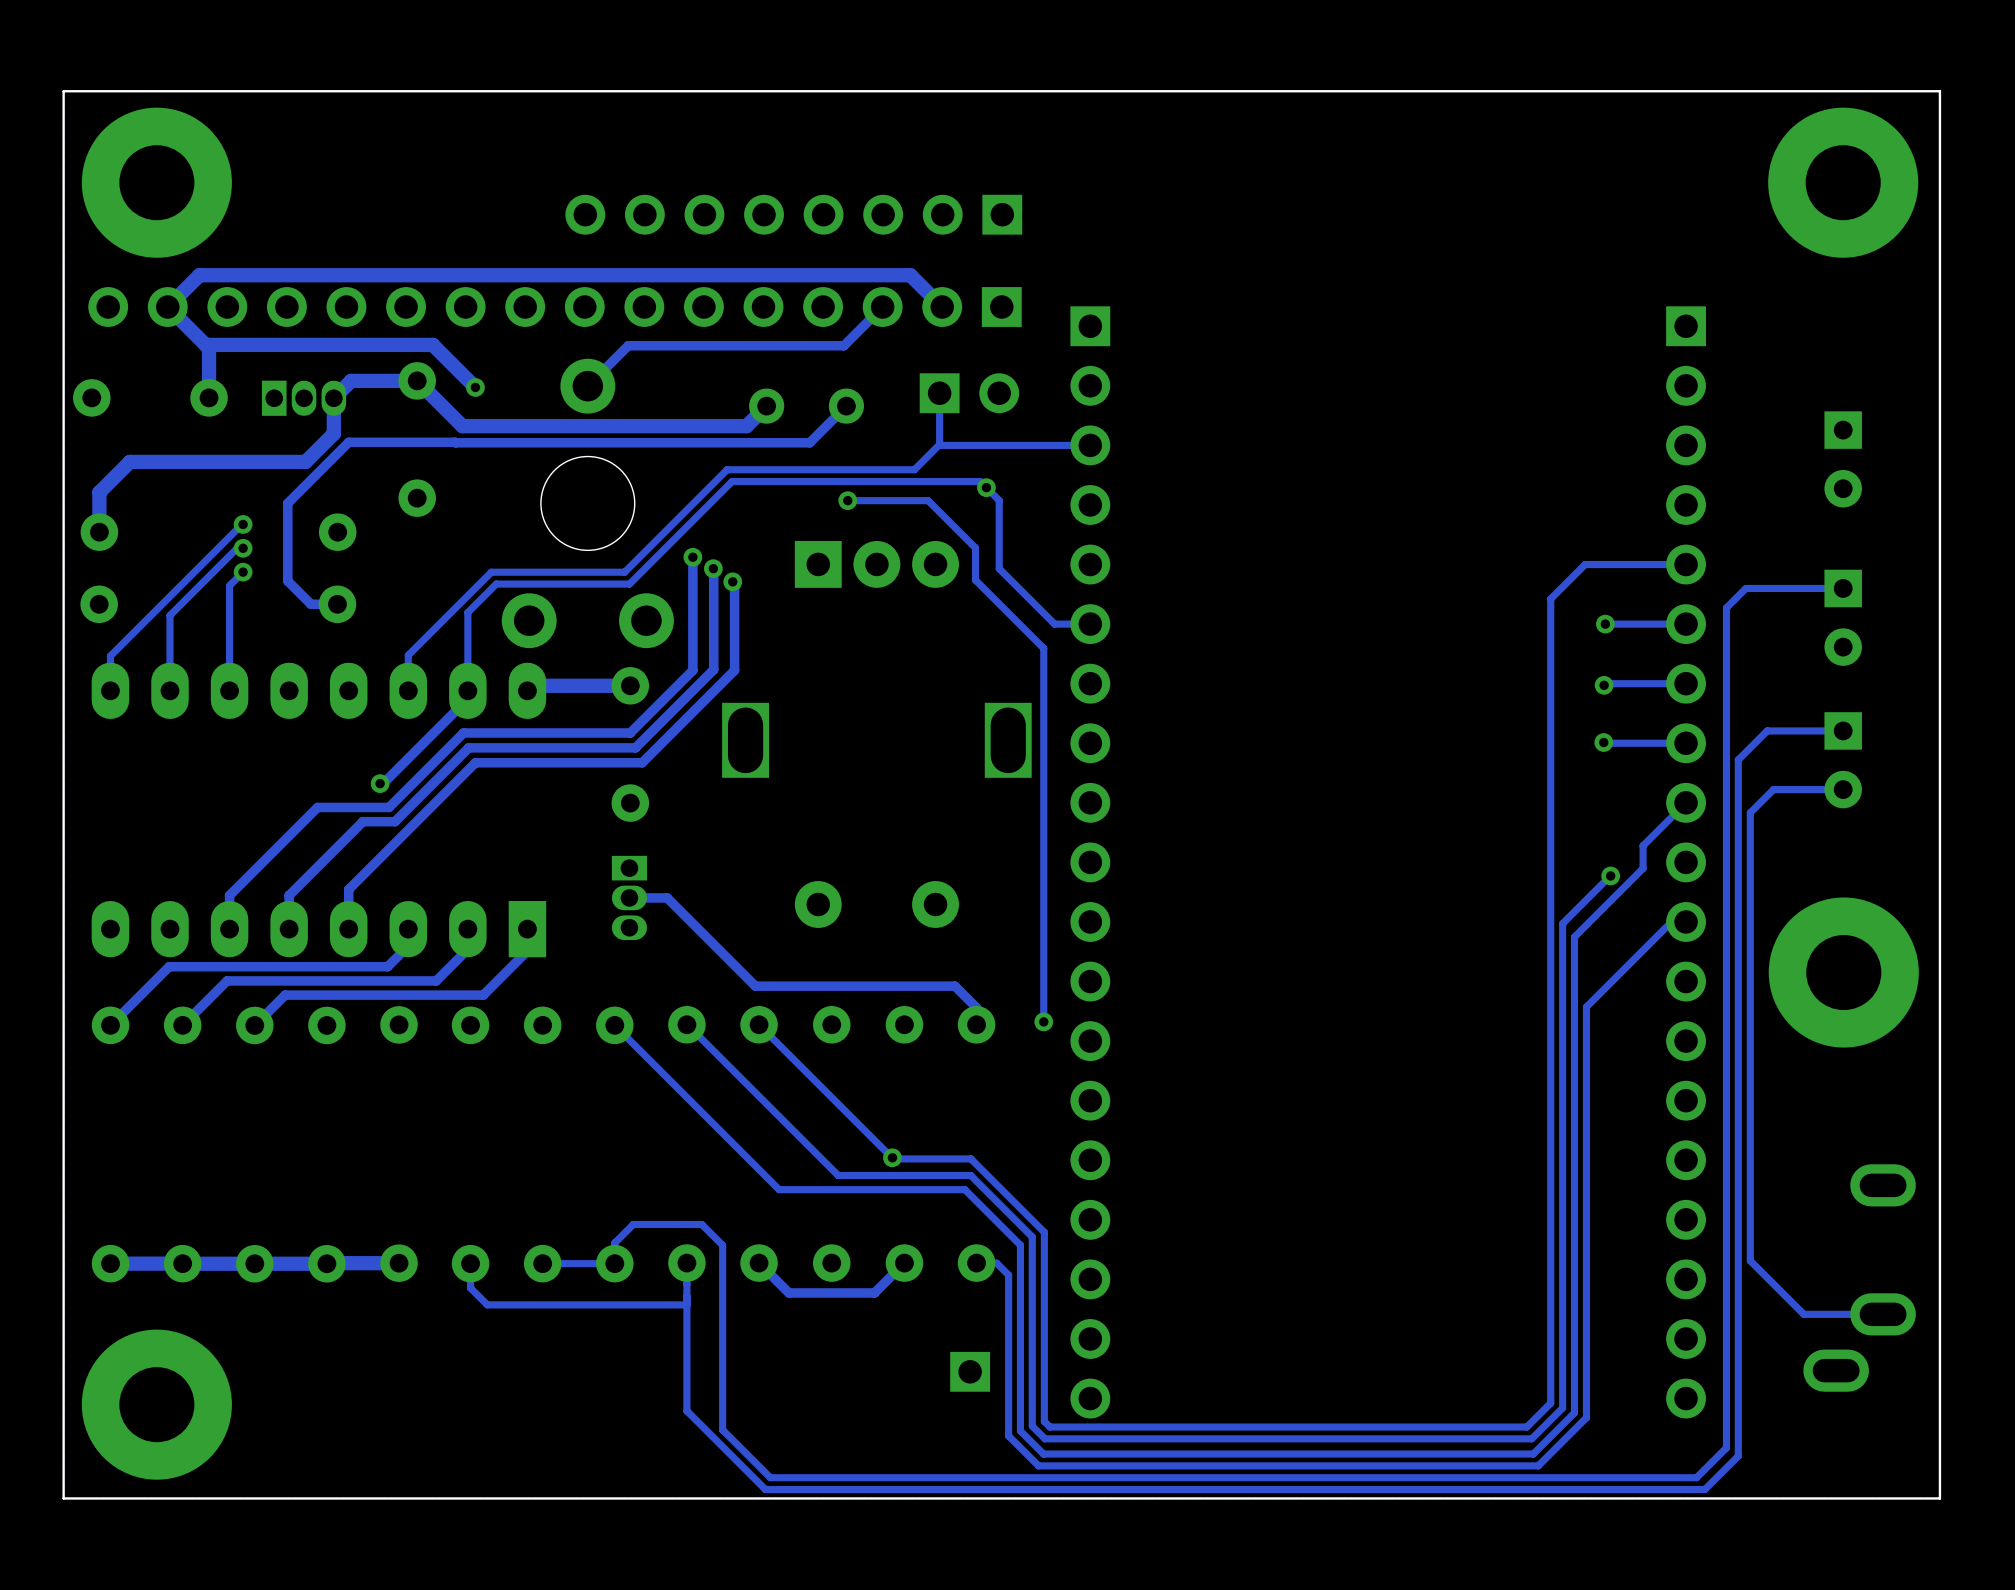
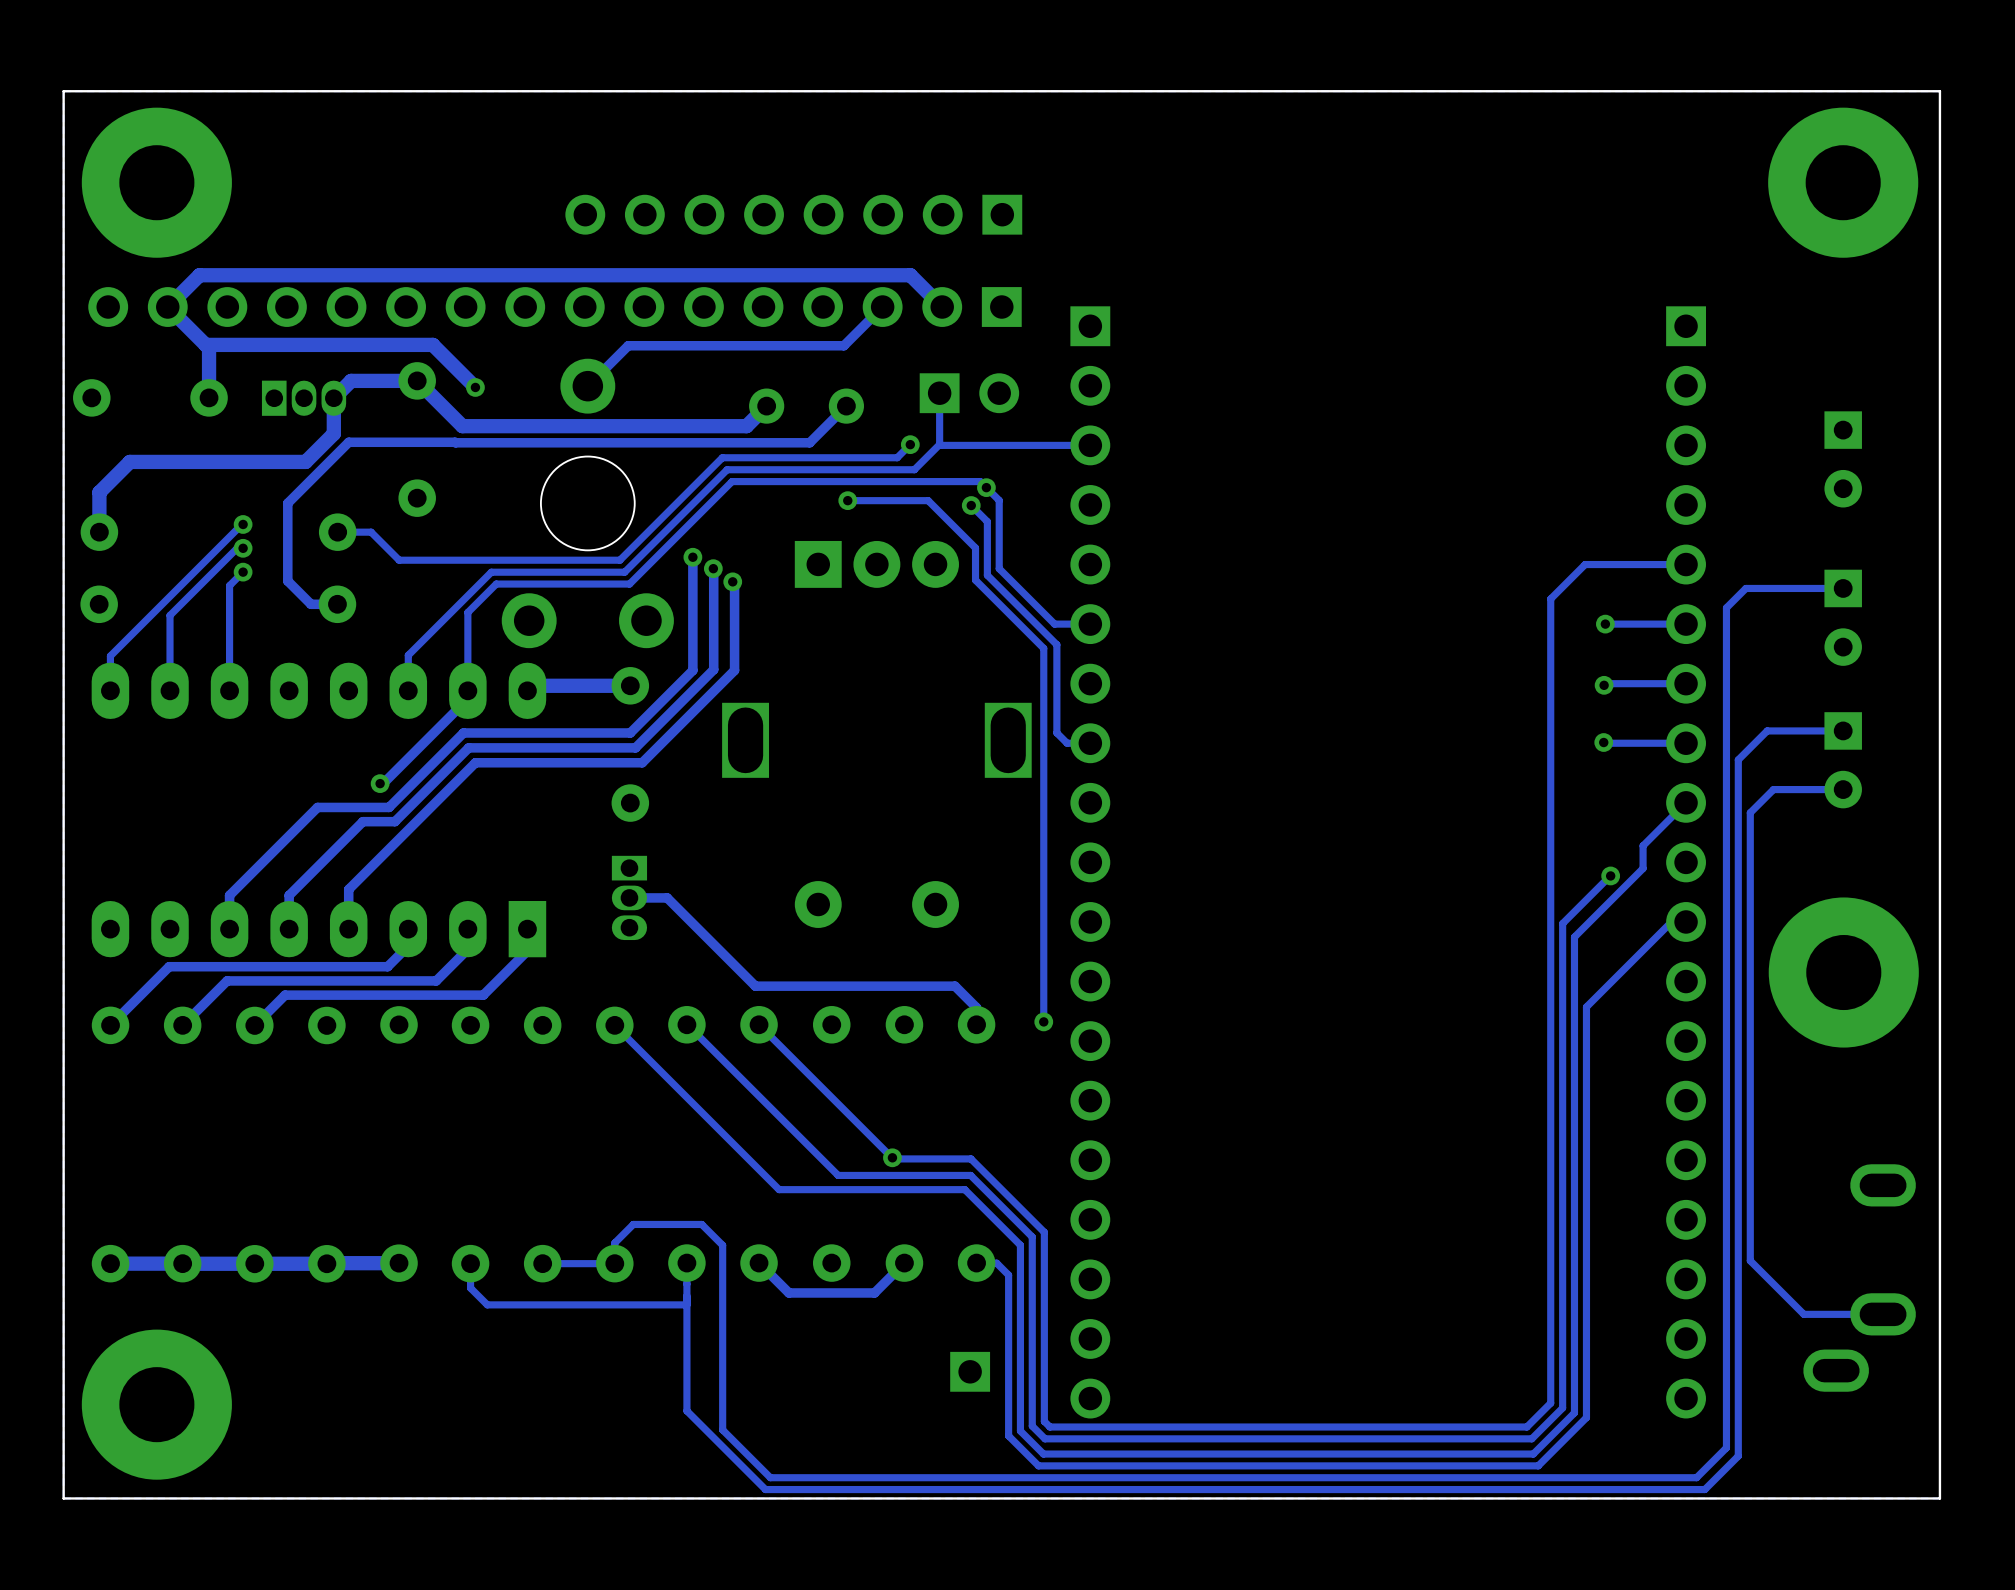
track: none -> (910, 444) (897, 457) (722, 457) (619, 560) (399, 560) (371, 532) (337, 532)
via: none -> (910, 444)
track: none -> (971, 505) (987, 521) (987, 575) (1056, 644) (1056, 732) (1067, 743) (1090, 743)
via: none -> (971, 505)

